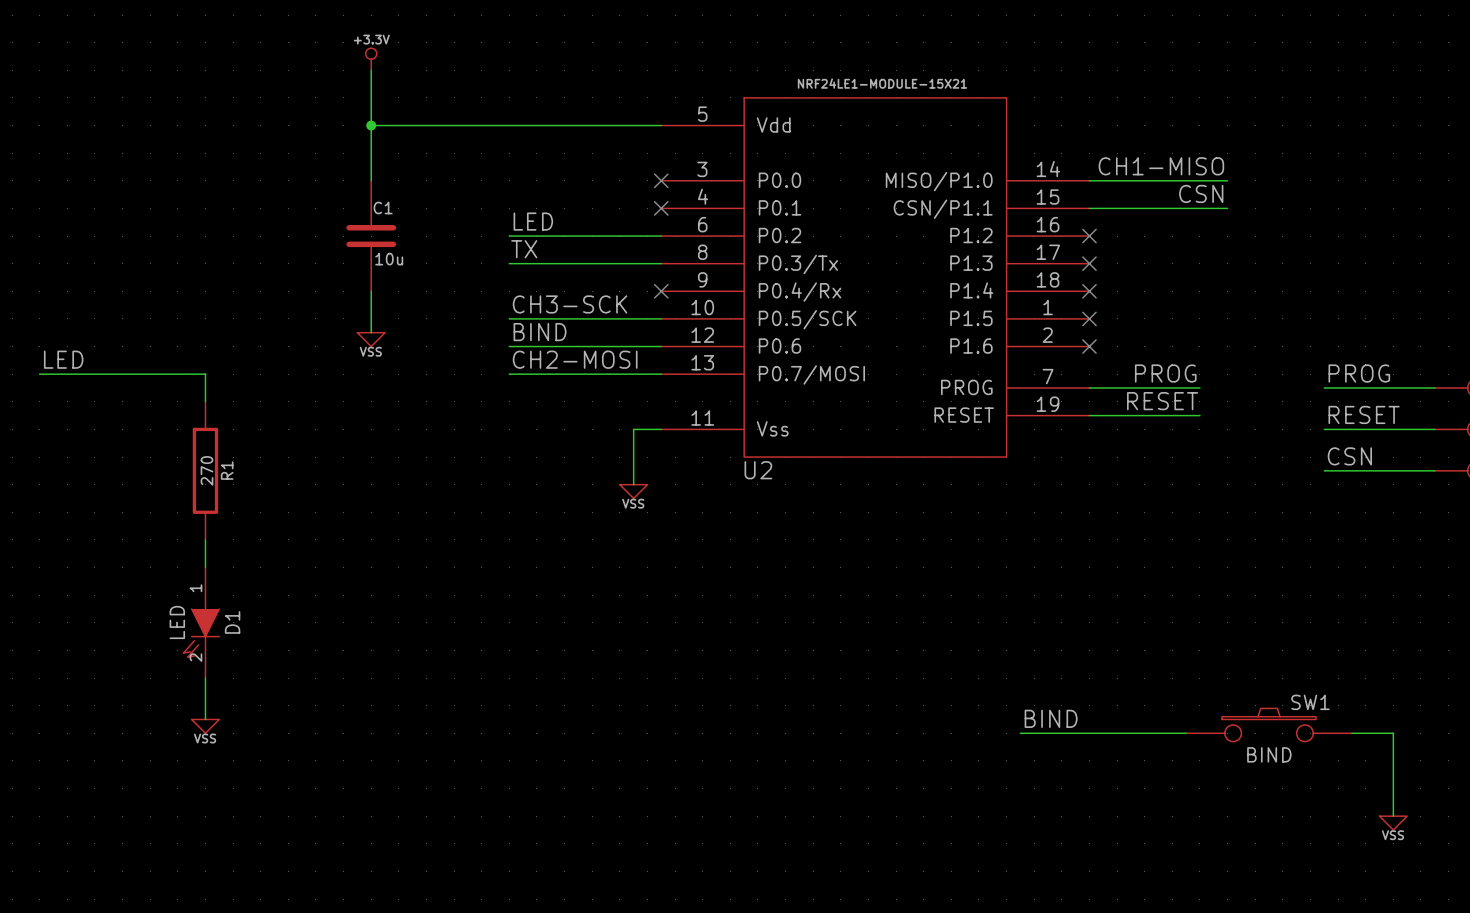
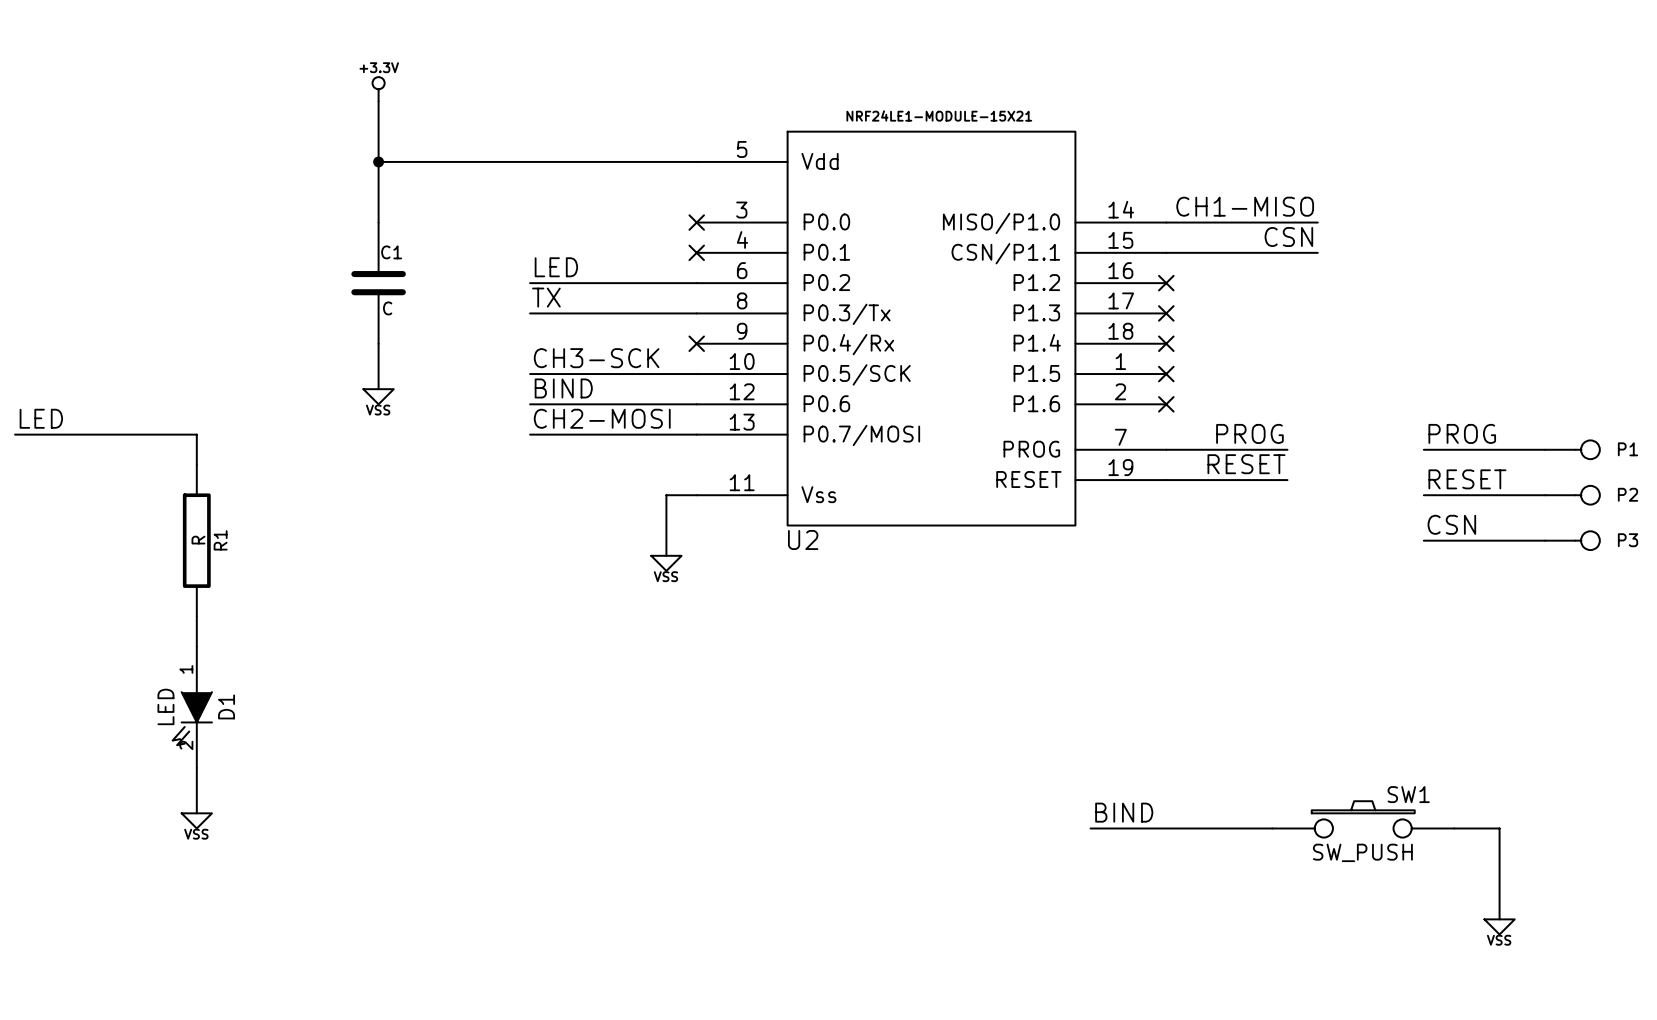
C1 value: 10u (389, 259) -> C (387, 308)
R1 value: 270 (206, 470) -> R (198, 540)
SW1 value: BIND (1269, 754) -> SW_PUSH (1362, 852)

